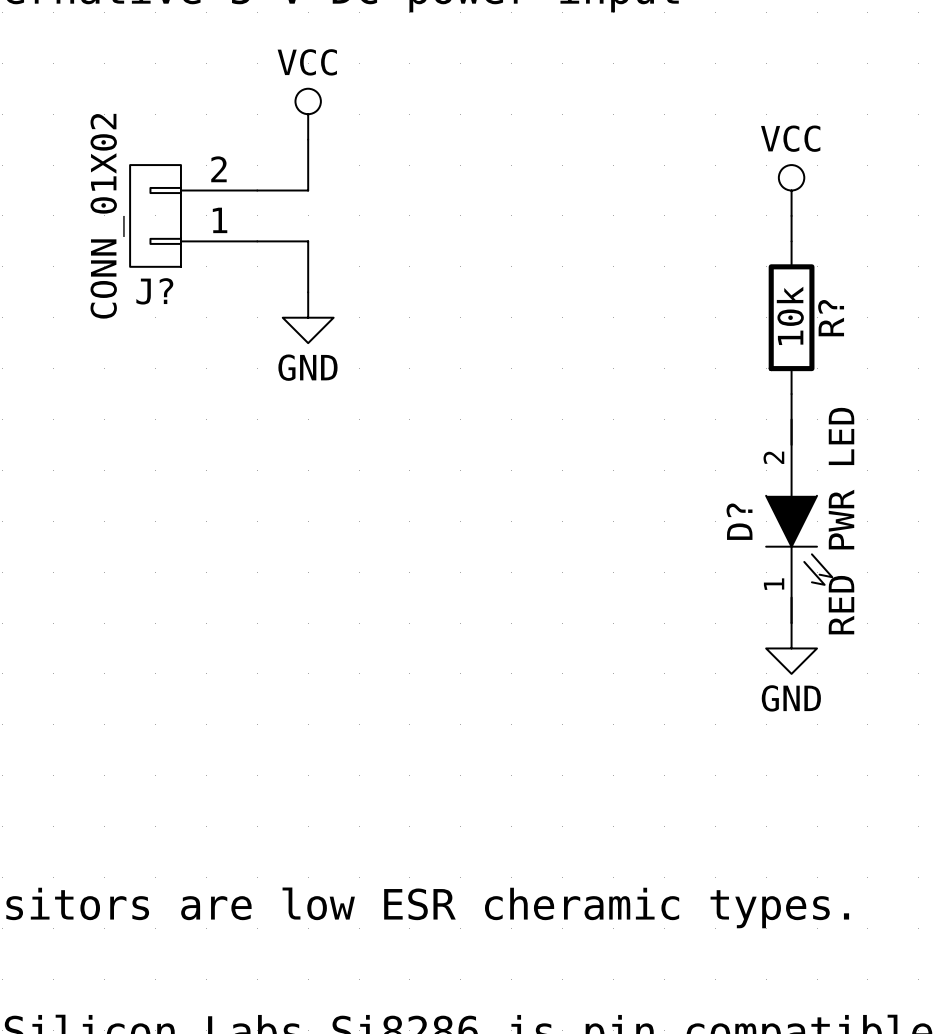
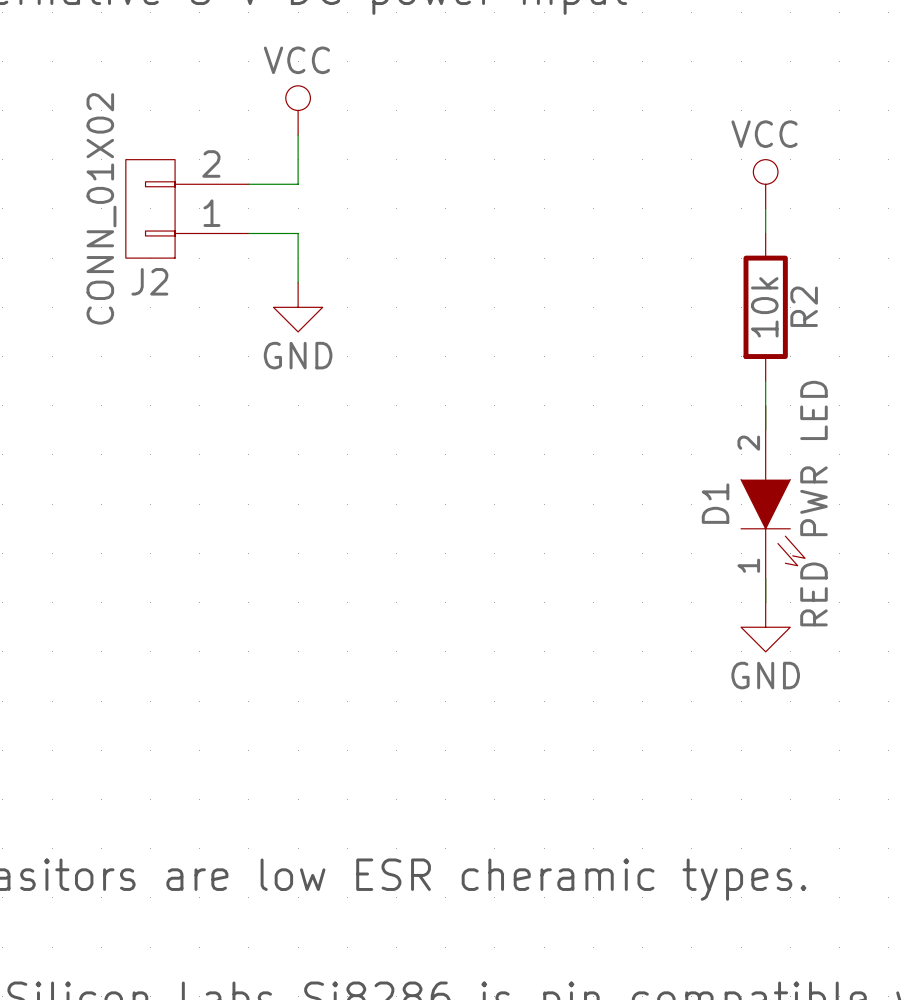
J? name: J? (154, 291) -> J2 (149, 281)
R? name: R? (831, 318) -> R2 (804, 306)
D? name: D? (739, 521) -> D1 (715, 503)

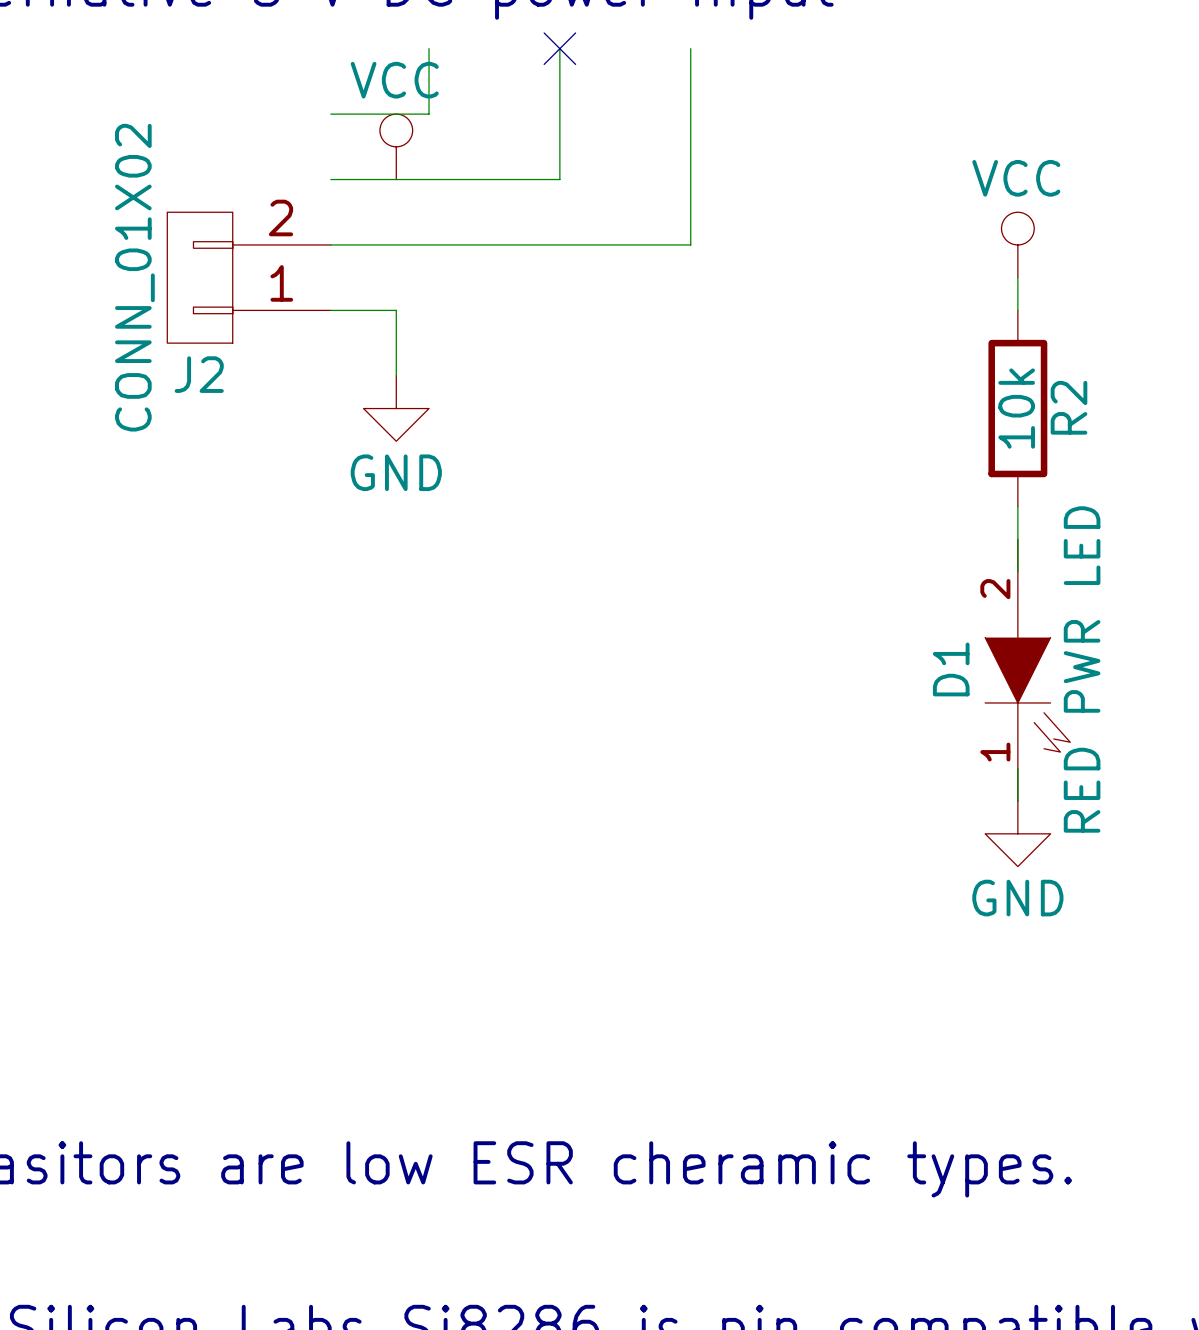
wire: none -> (429, 48) (429, 114) (330, 114)
wire: none -> (559, 48) (559, 179) (330, 179)
no-connect mark: none -> (559, 48)
wire: (298, 135) (298, 184) -> (690, 48) (690, 244) (396, 244)

